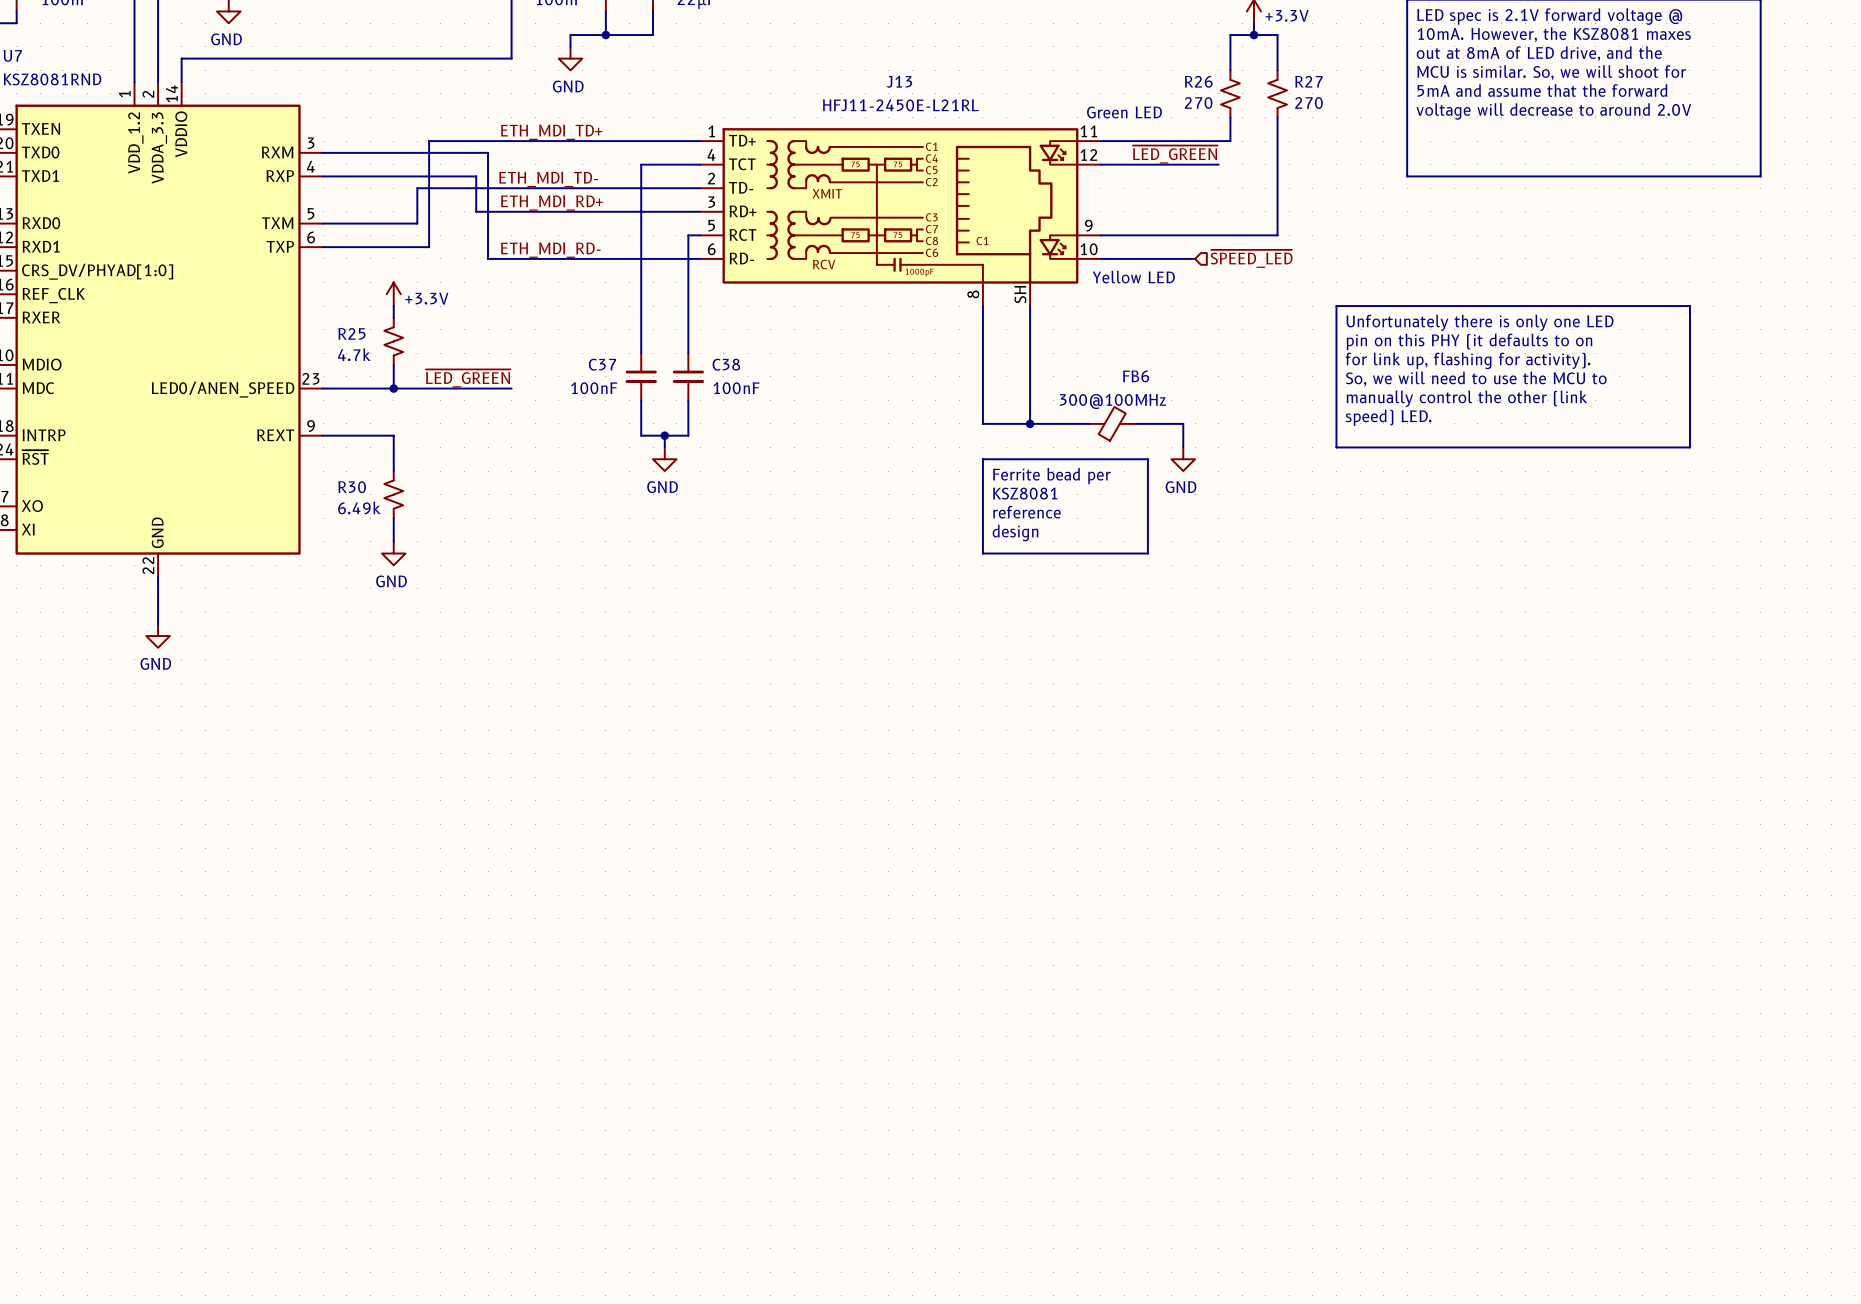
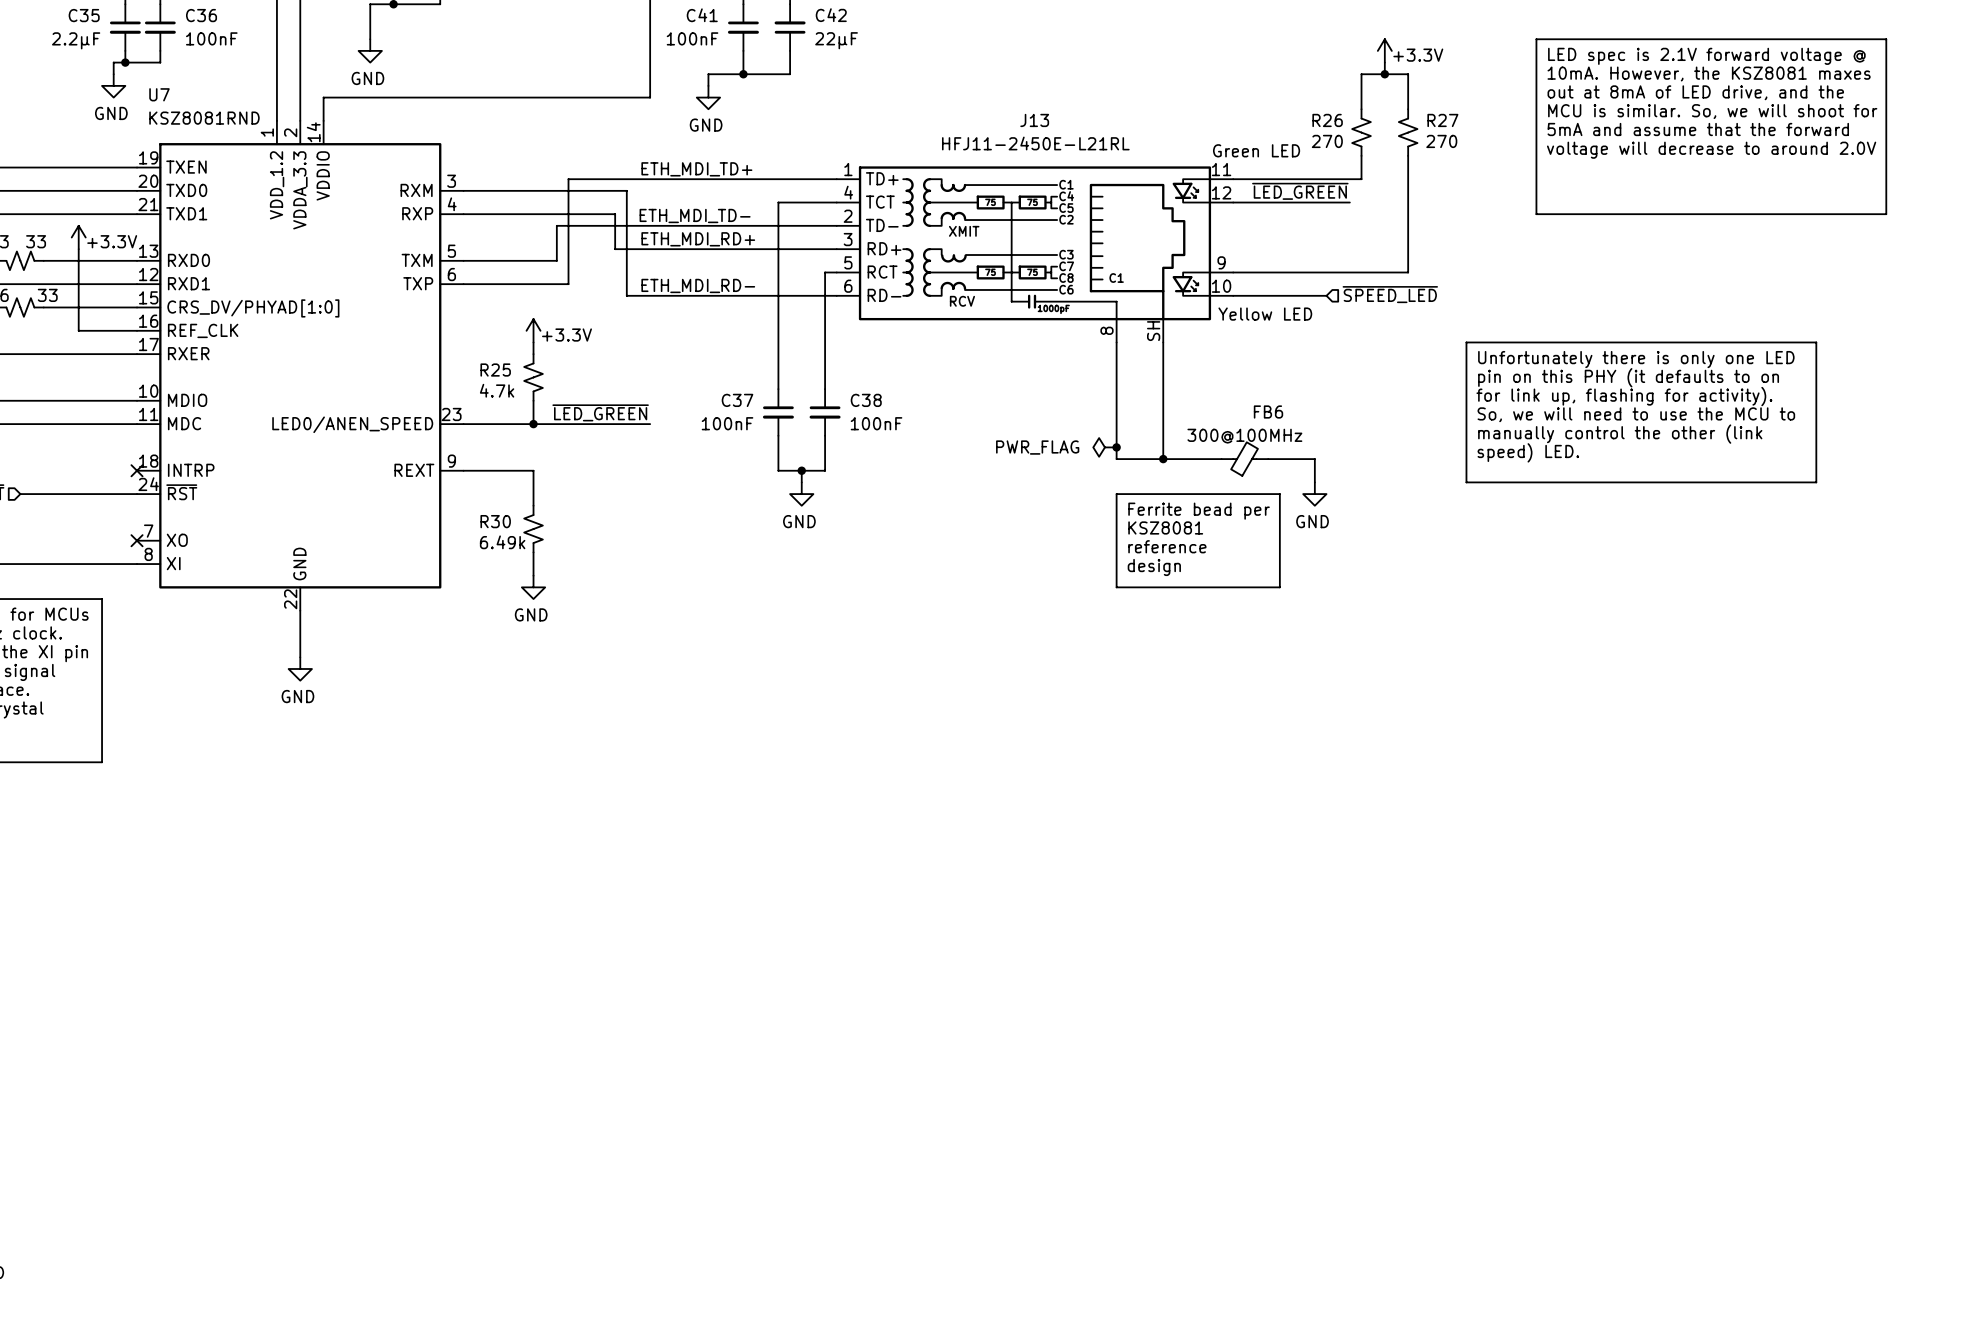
power symbol: none -> PWR_FLAG (1104, 447)
junction: none -> (1116, 447)

